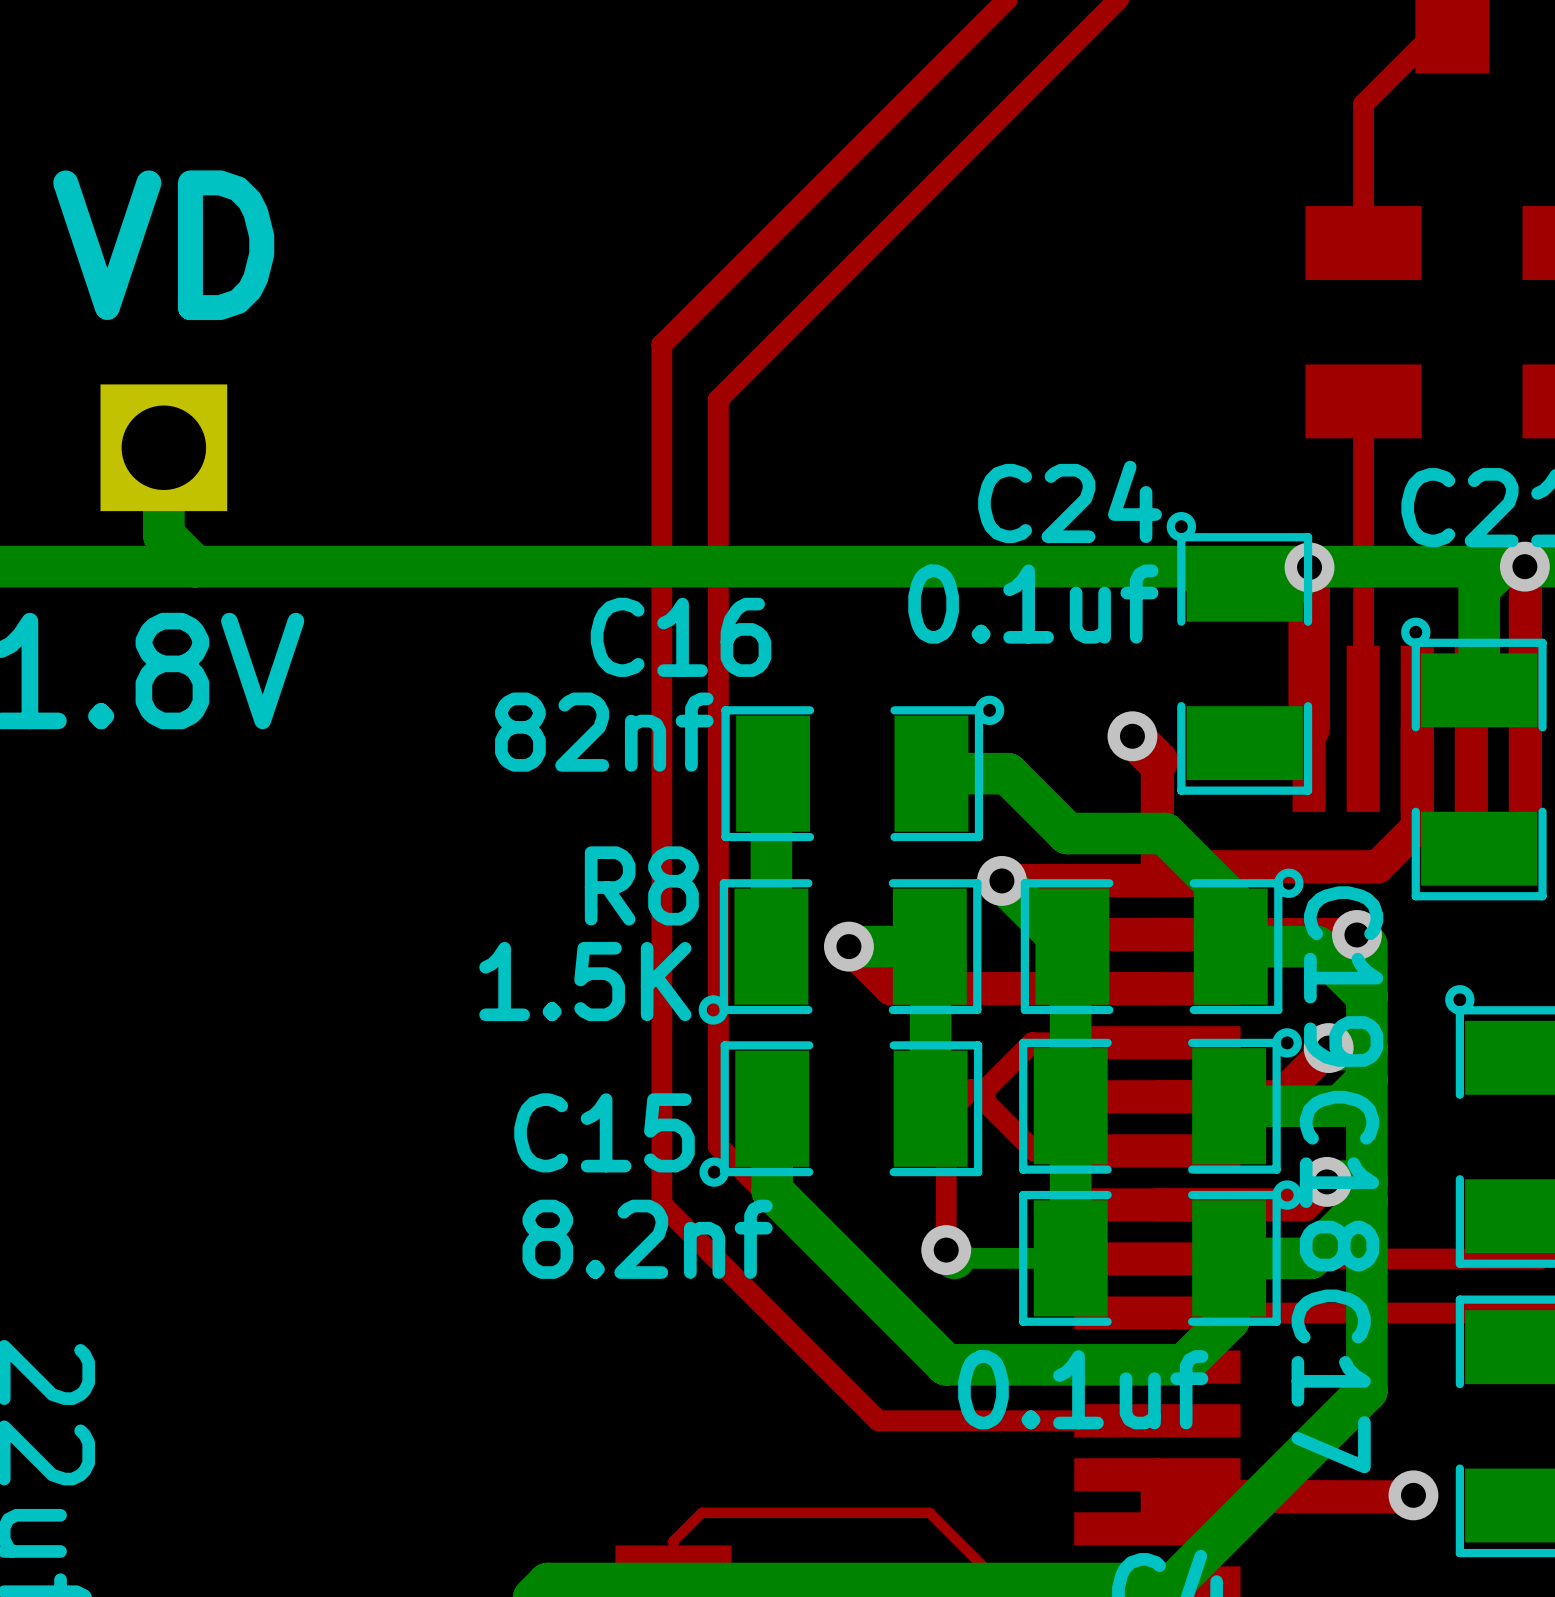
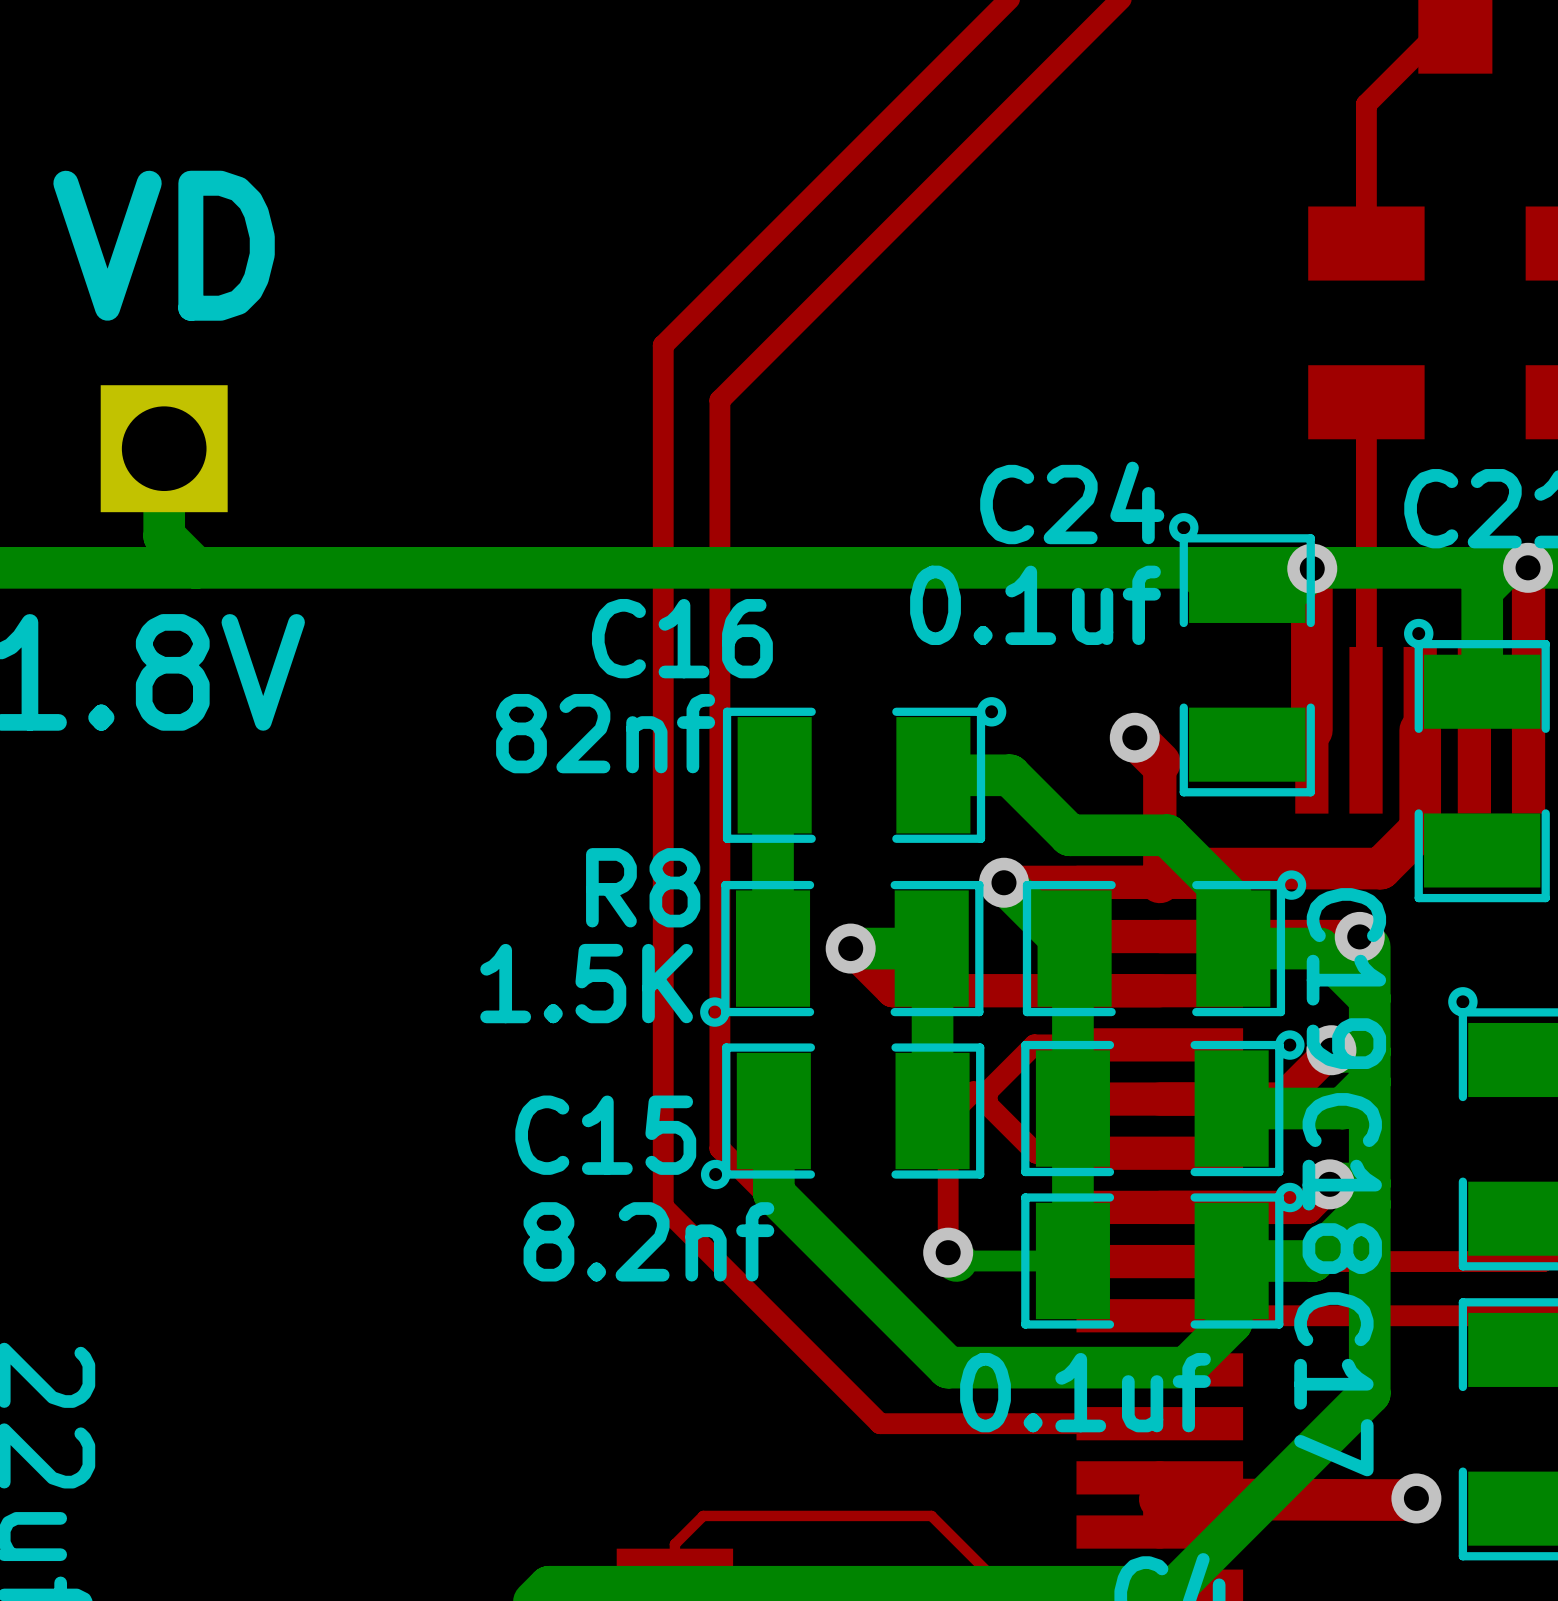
top track width: thin (1417, 728) (1417, 827) (1377, 866) (1171, 866) (1157, 880) -> thick (1420, 730) (1420, 828) (1380, 868) (1173, 868) (1159, 882)
top track width: thin (1157, 1496) (1411, 1497) -> thick (1159, 1499) (1414, 1500)

